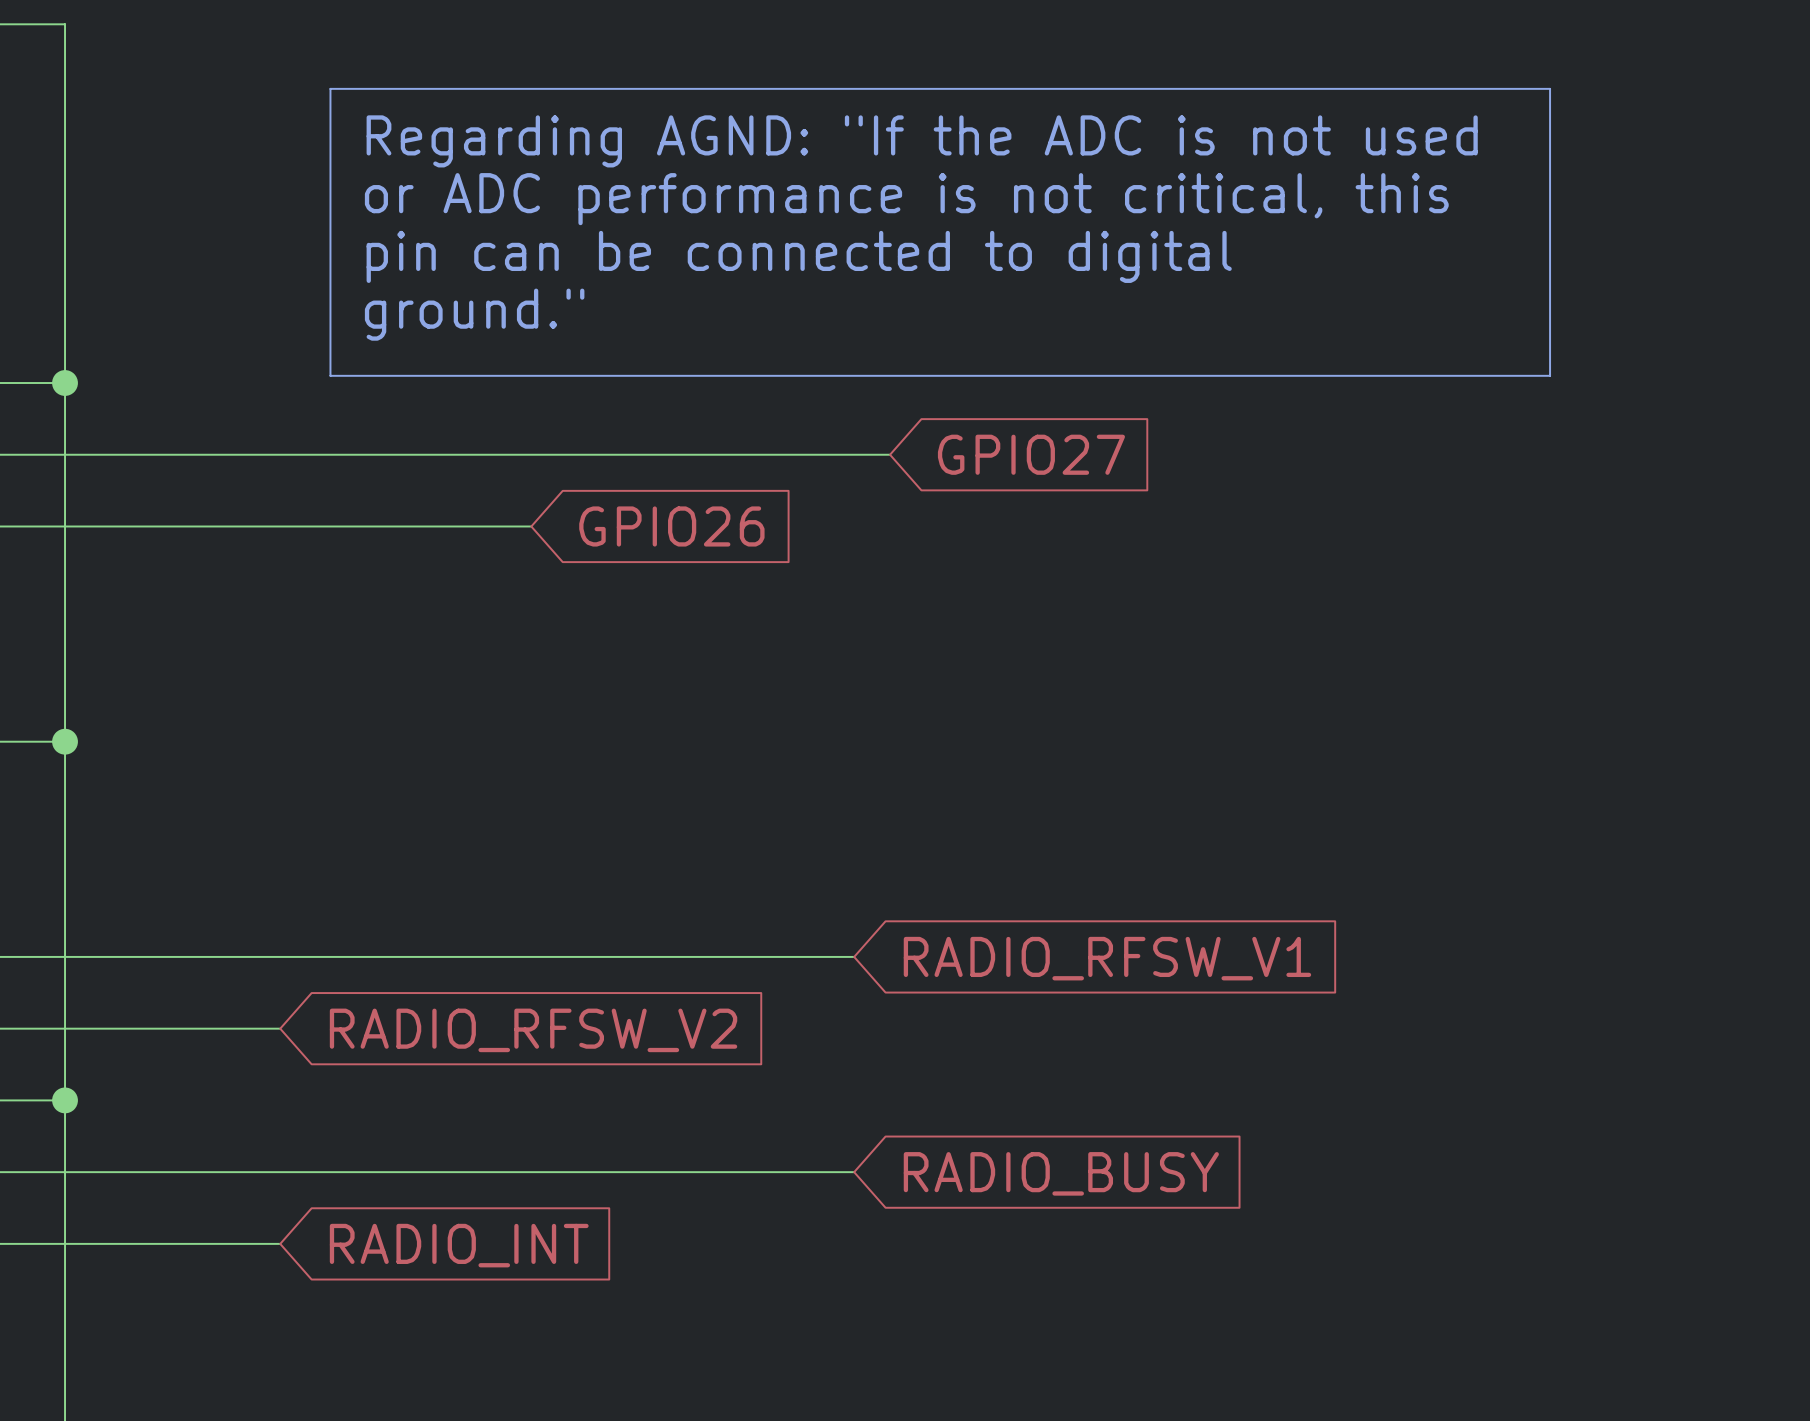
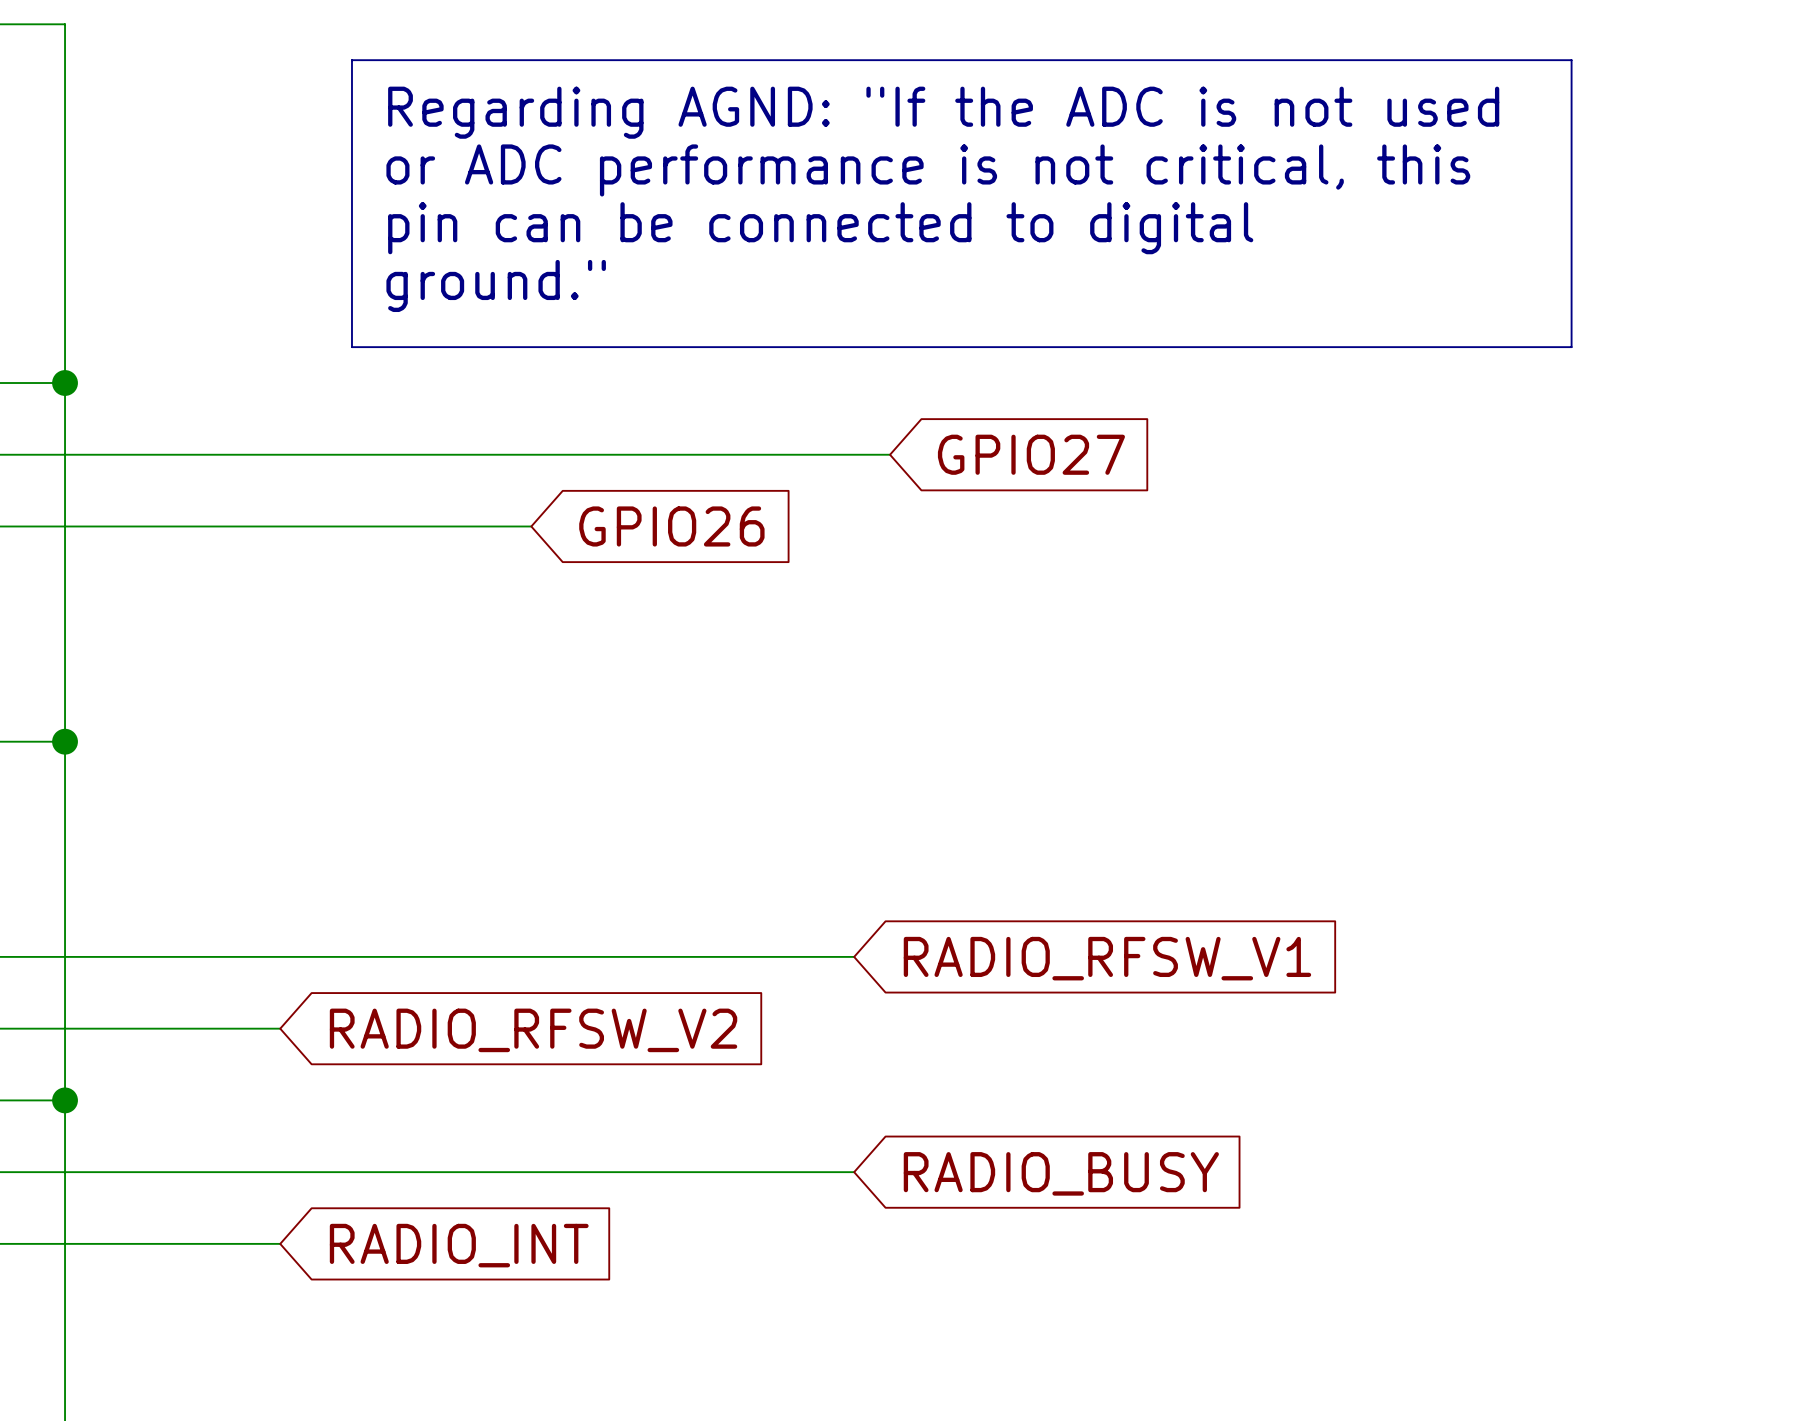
line: (330, 88) (1550, 88) (1550, 375) (330, 375) (330, 88) -> (351, 60) (1571, 60) (1571, 347) (351, 347) (351, 60)
text position: Regarding AGND: "If the ADC is not used (922, 141) -> Regarding AGND: "If the ADC is not used (943, 112)
text position: or ADC performance is not critical, this (906, 199) -> or ADC performance is not critical, this (928, 170)
text position: pin can be connected to digital (799, 256) -> pin can be connected to digital (820, 228)
text position: ground." (474, 314) -> ground." (496, 285)

